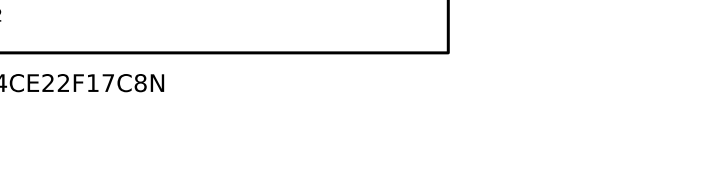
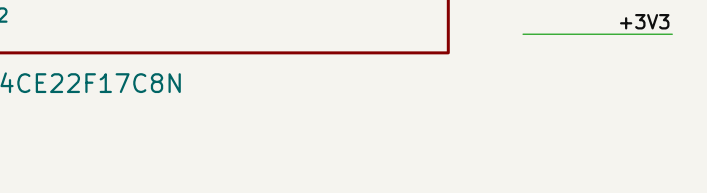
label: none -> +3V3 (644, 21)
wire: none -> (522, 34) (672, 34)

